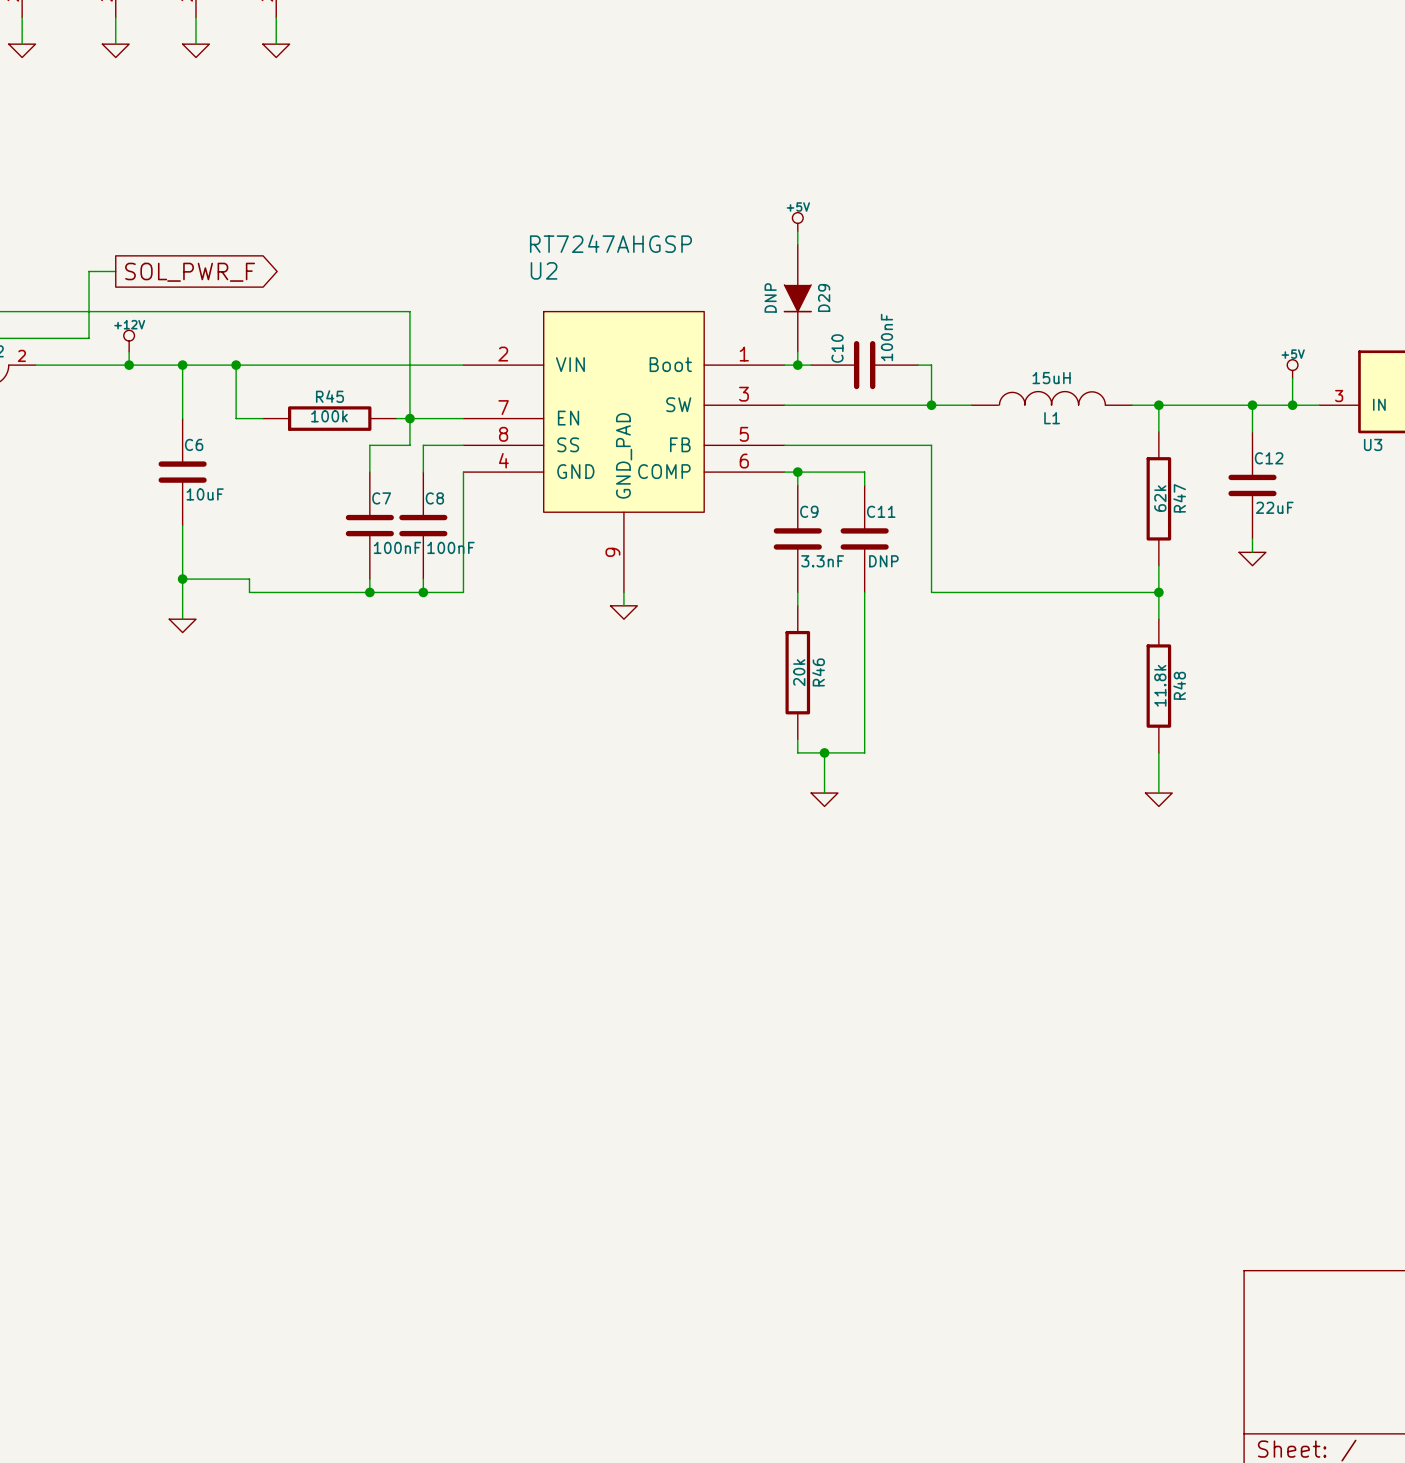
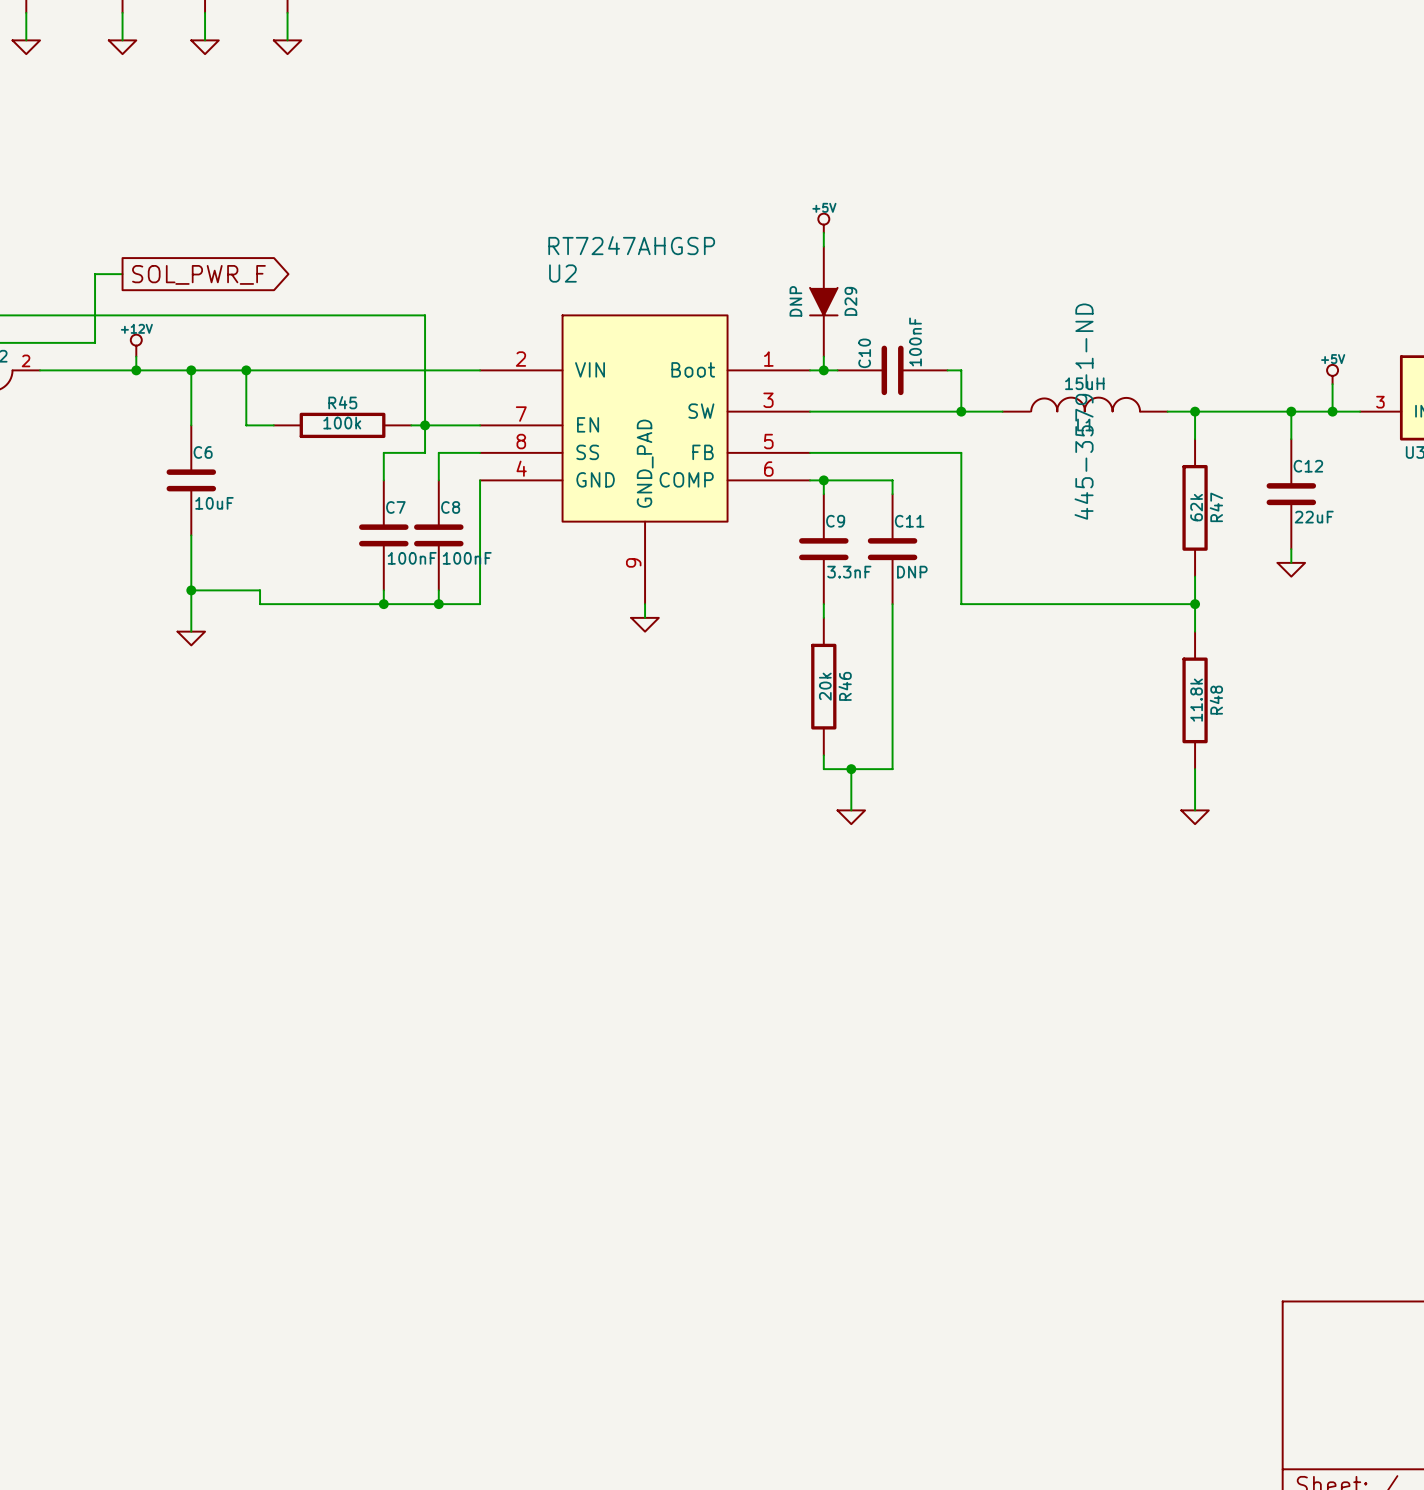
L1 text: none -> 445-3579-1-ND (1084, 411)

